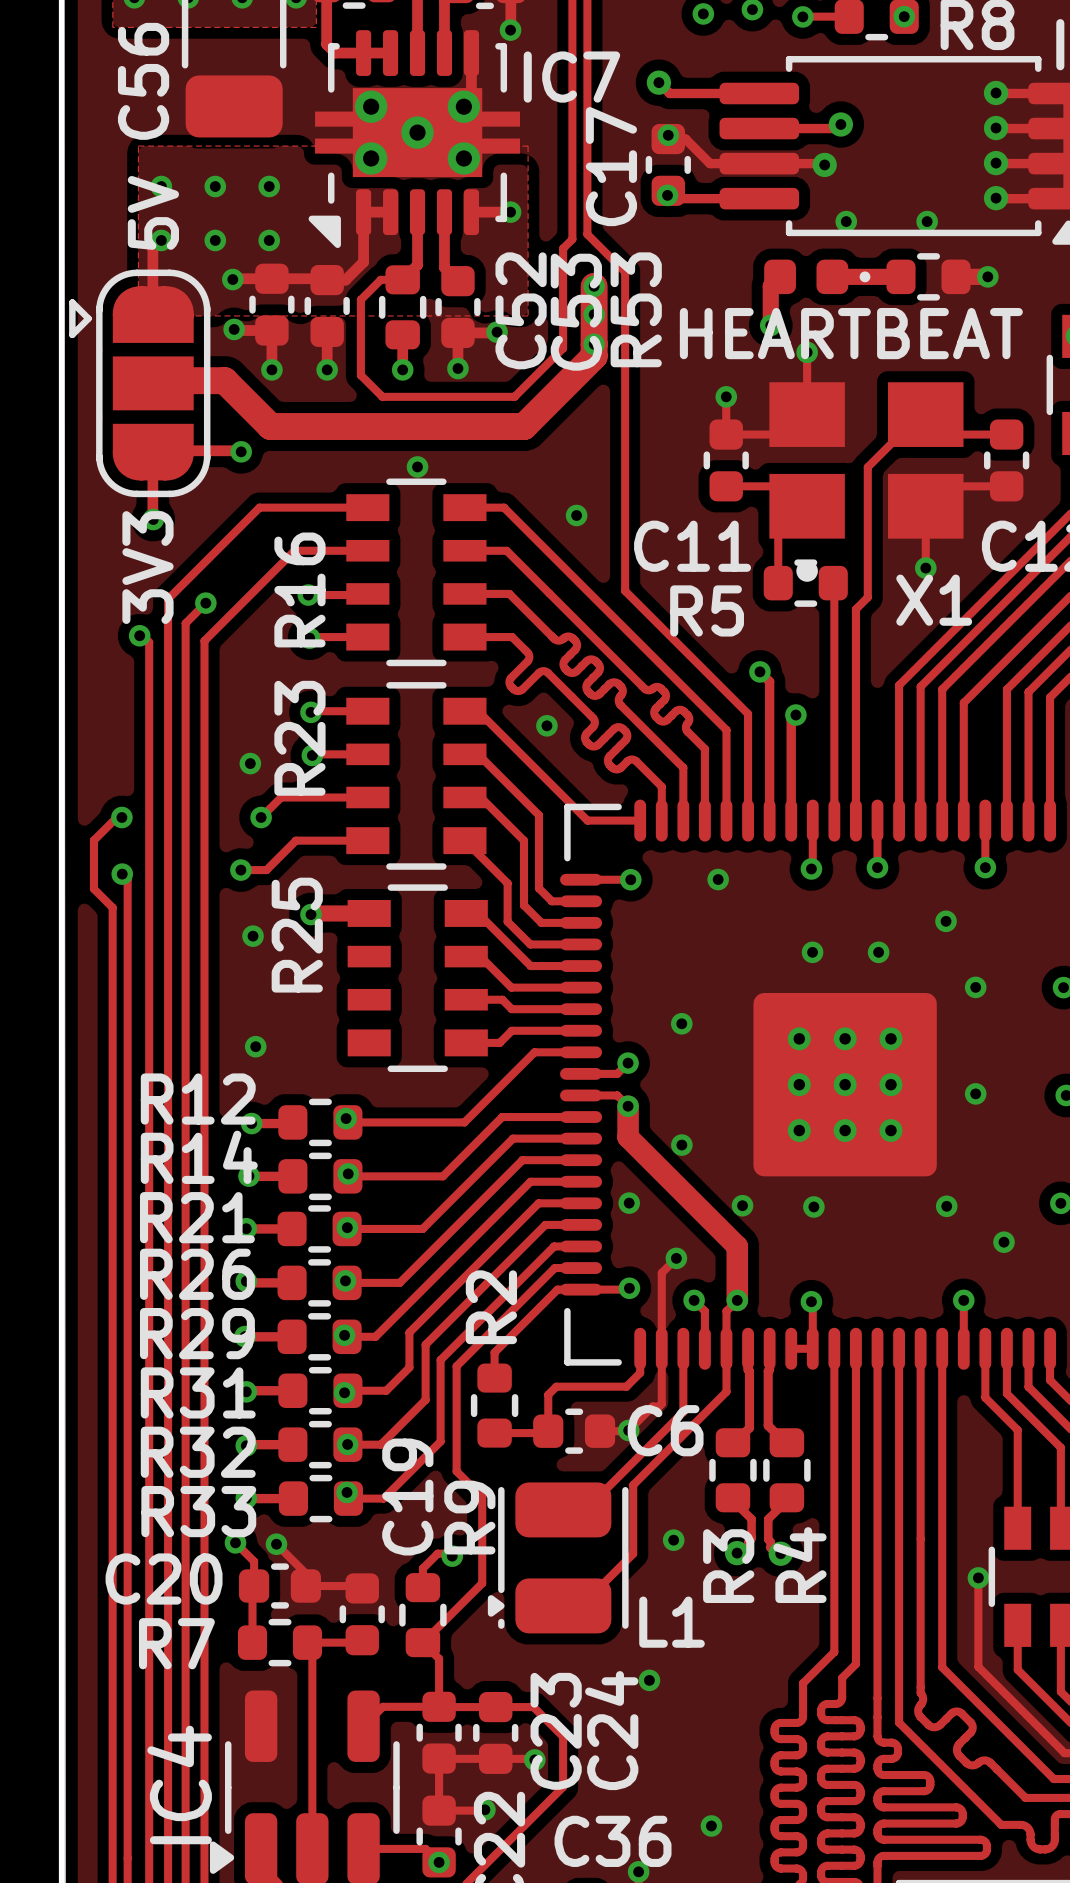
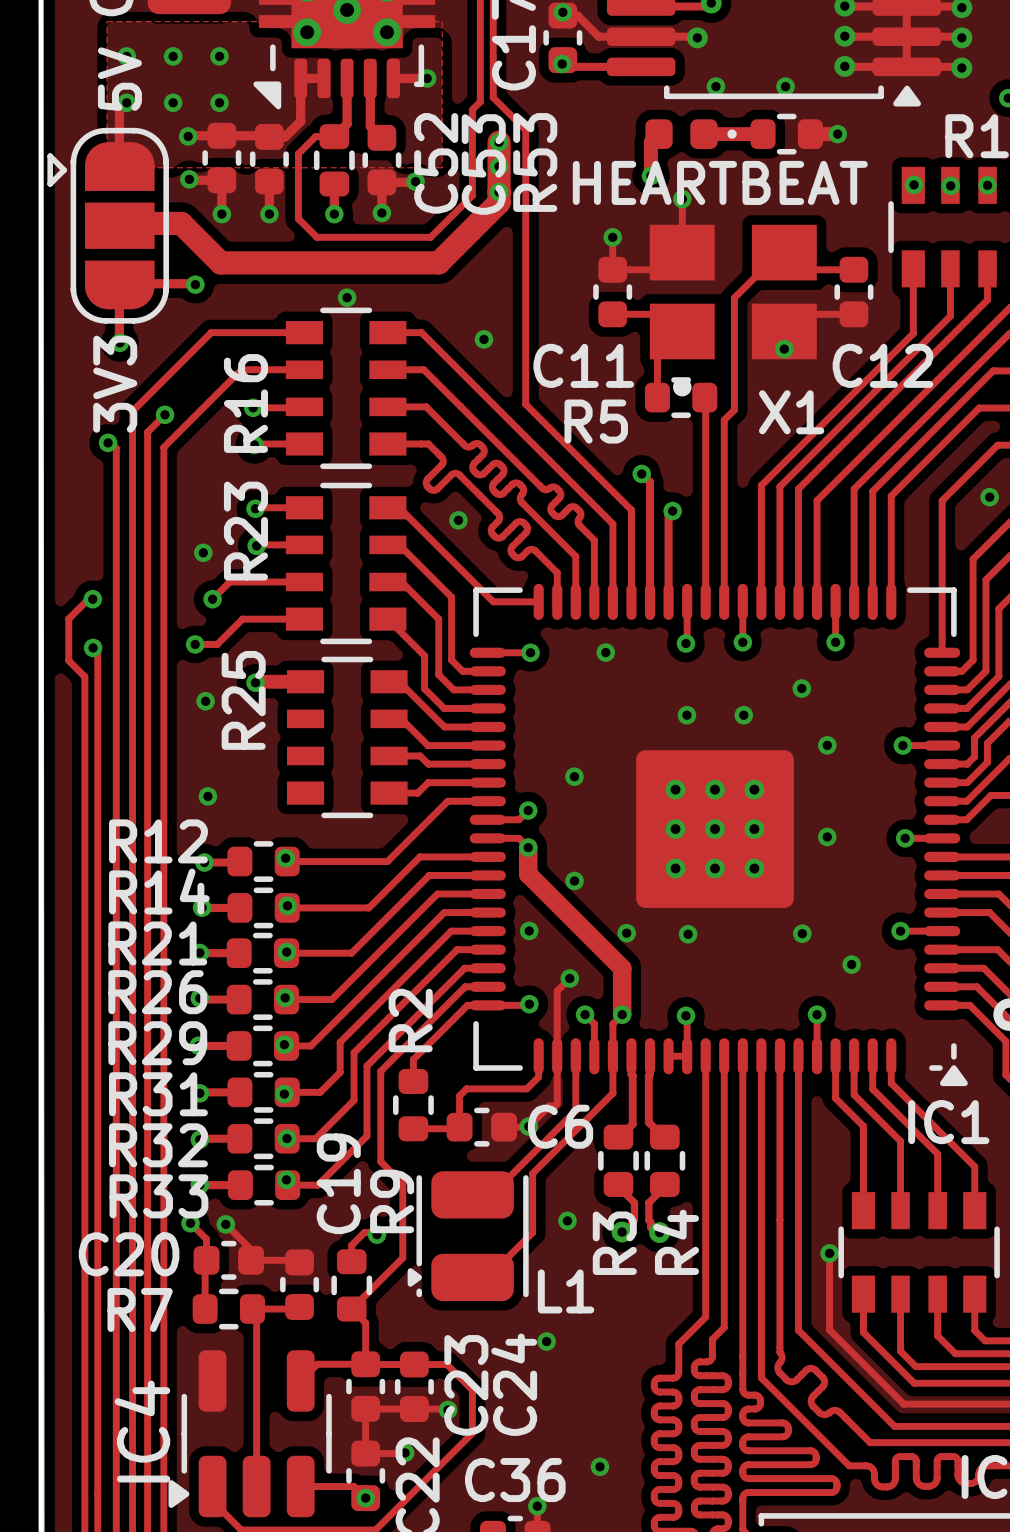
track: (925, 526) (925, 568) -> none
via position: (925, 568) -> (784, 349)

